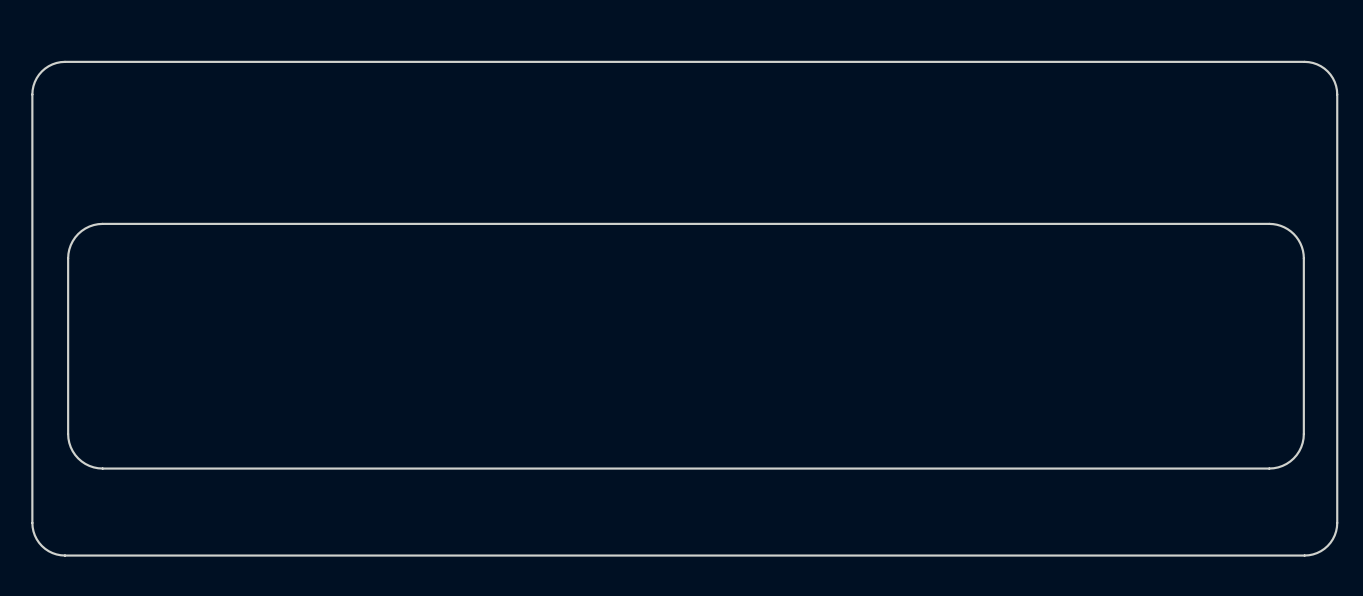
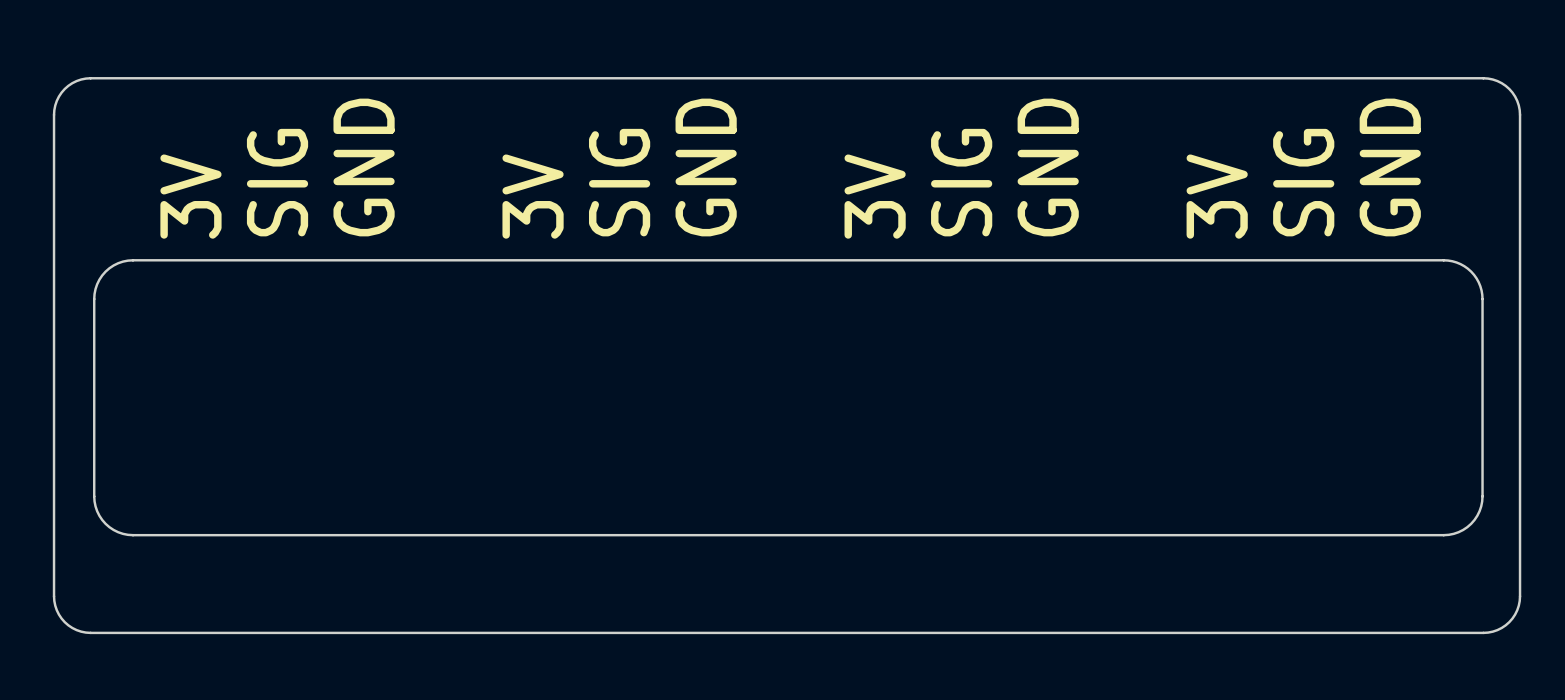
text: none -> GND (364, 167)
text: none -> GND (706, 167)
text: none -> GND (1048, 167)
text: none -> GND (1390, 167)
text: none -> SIG (277, 182)
text: none -> SIG (619, 182)
text: none -> SIG (961, 182)
text: none -> SIG (1303, 182)
text: none -> 3V (190, 196)
text: none -> 3V (533, 196)
text: none -> 3V (875, 196)
text: none -> 3V (1217, 196)

